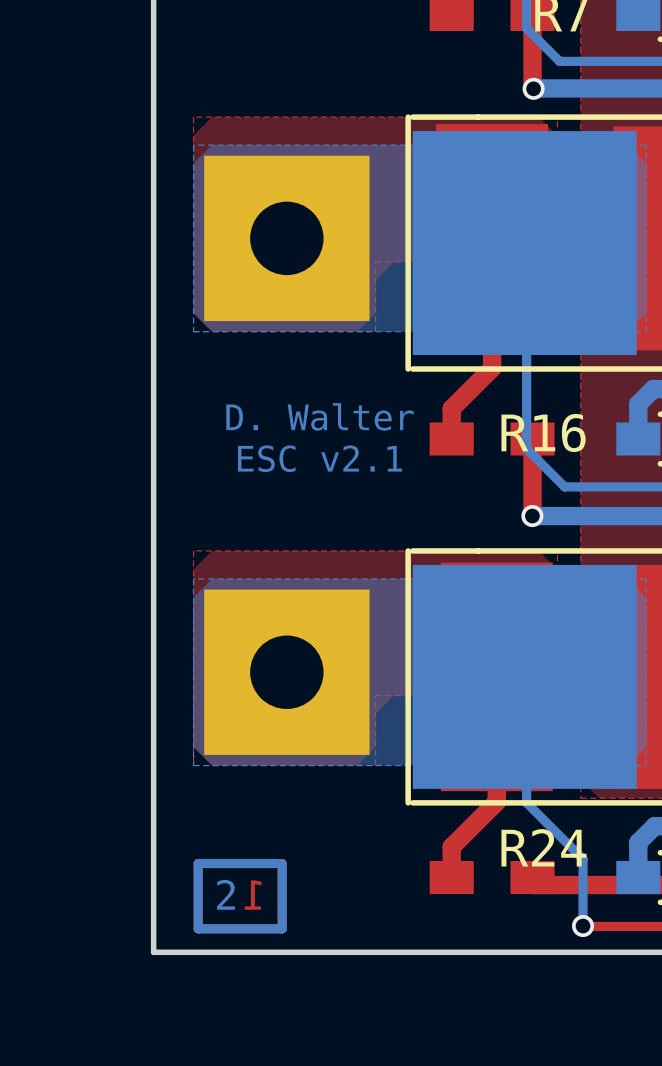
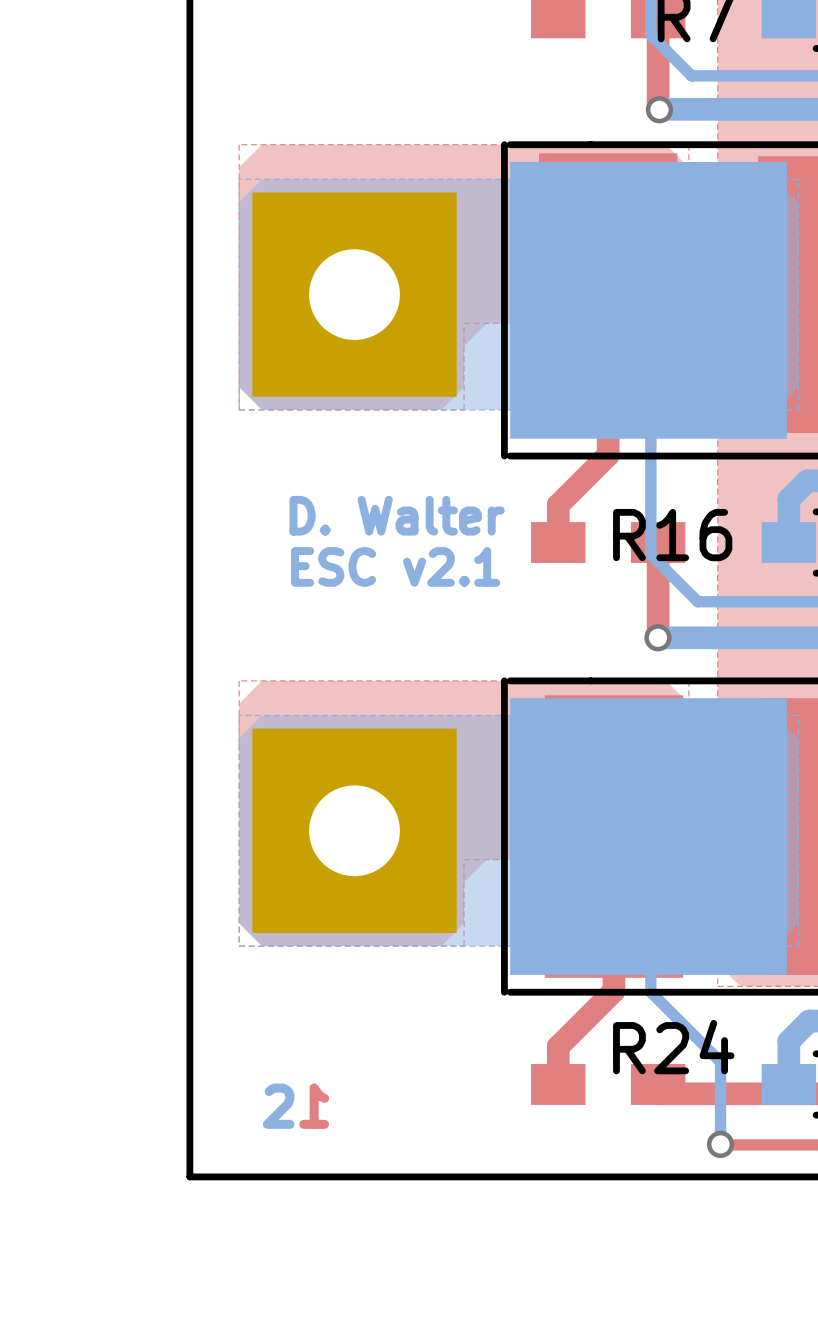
bottom track: (282, 863) (282, 928) (198, 928) (198, 863) (277, 863) -> none

